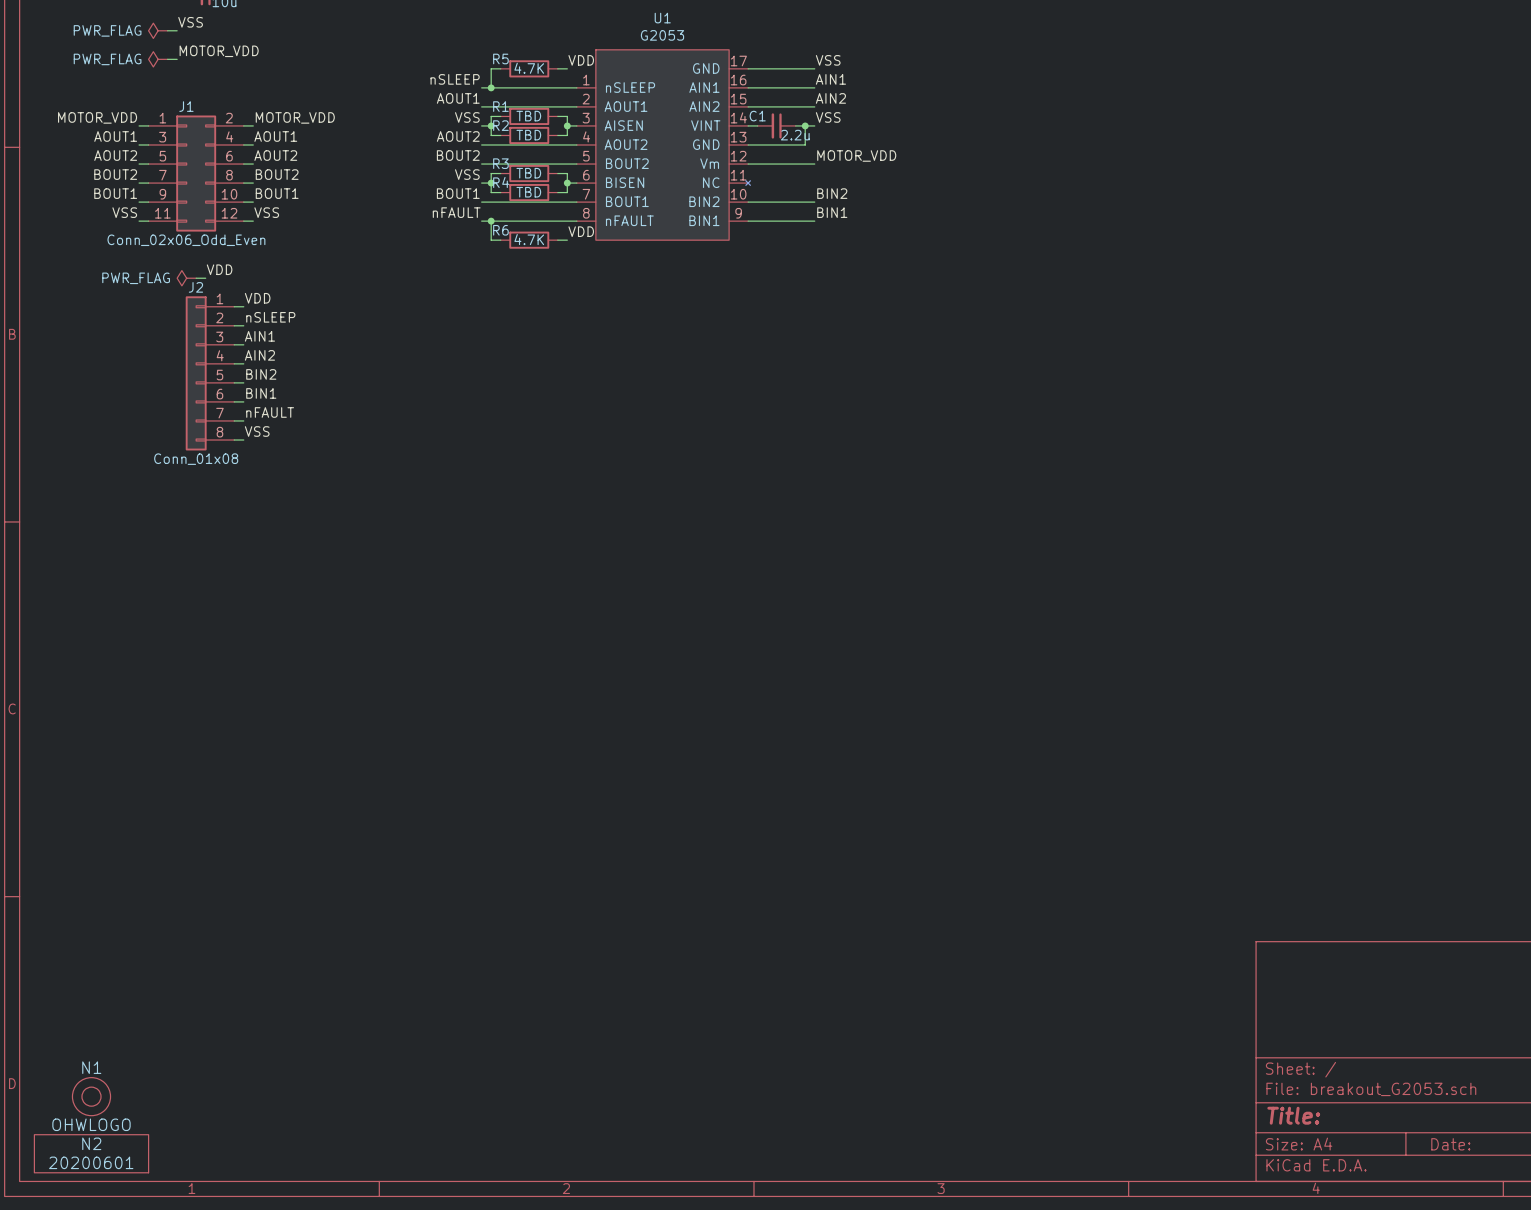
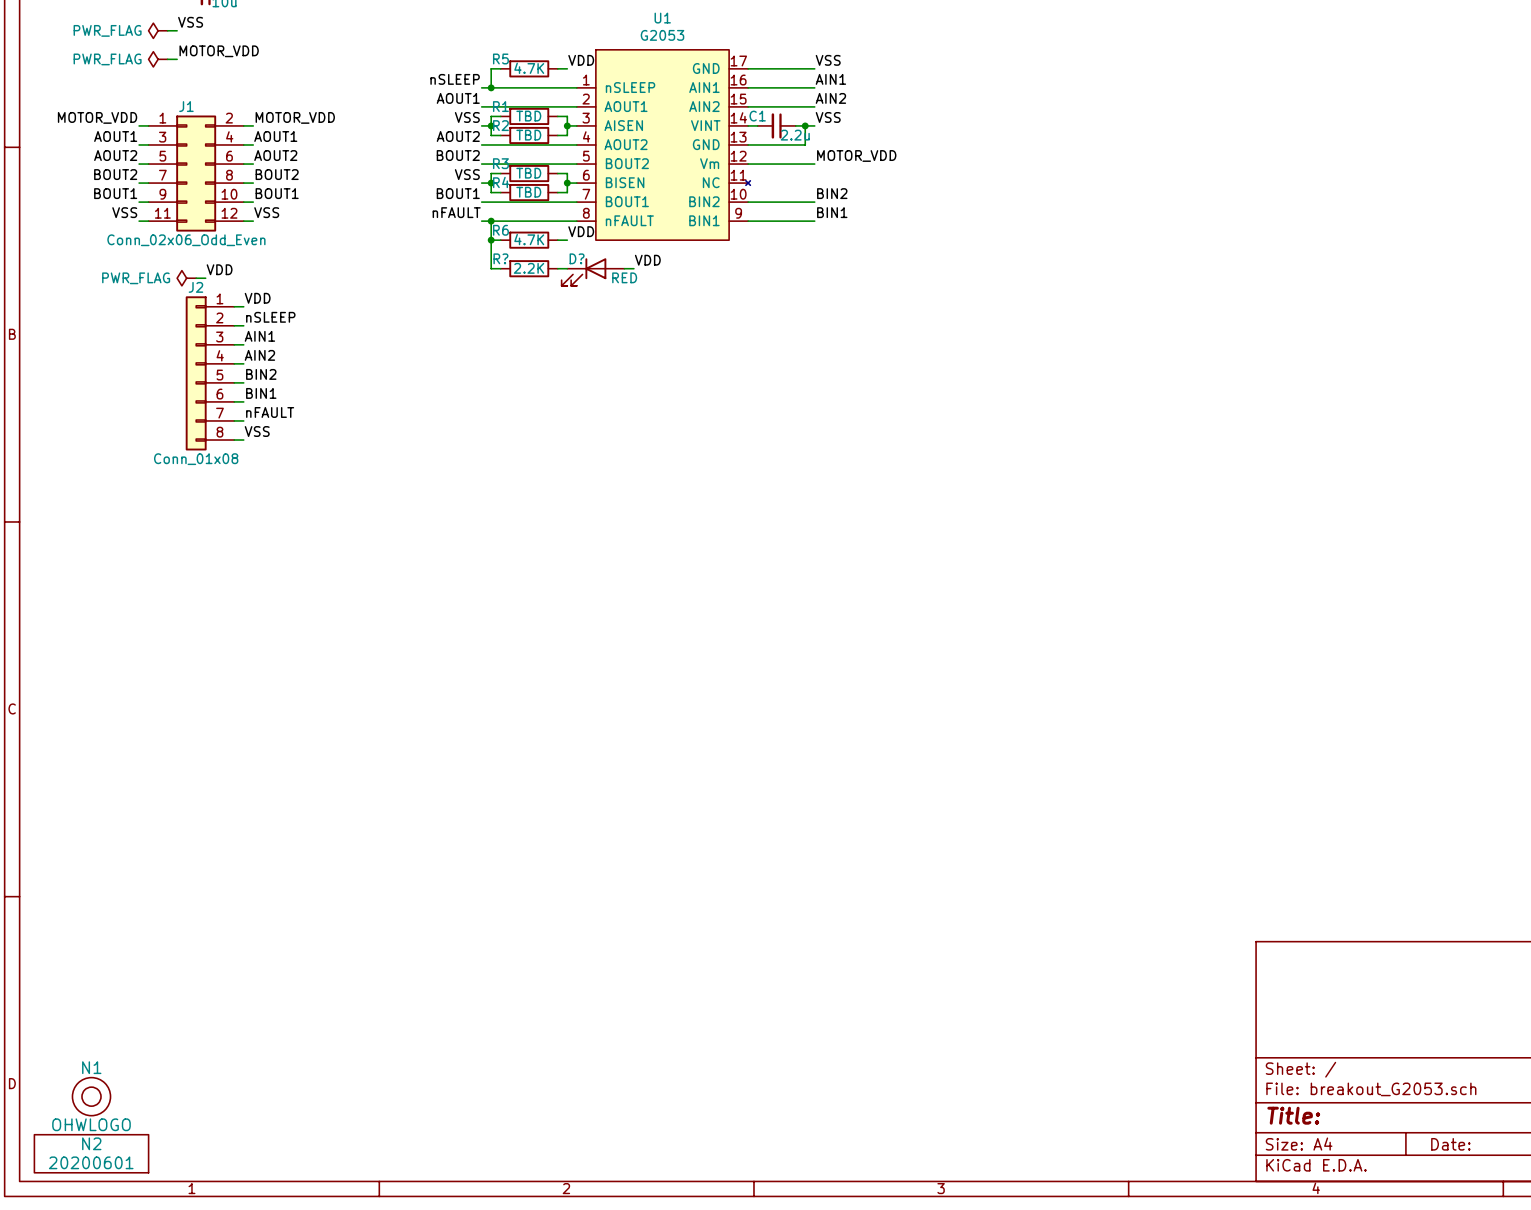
wire: none -> (491, 240) (491, 268) (500, 268)
junction: none -> (491, 240)
label: none -> VDD (647, 260)
R?: none -> 2.2K (529, 268)
wire: none -> (557, 268) (567, 268)
wire: none -> (624, 268) (633, 268)
D?: none -> RED (593, 272)

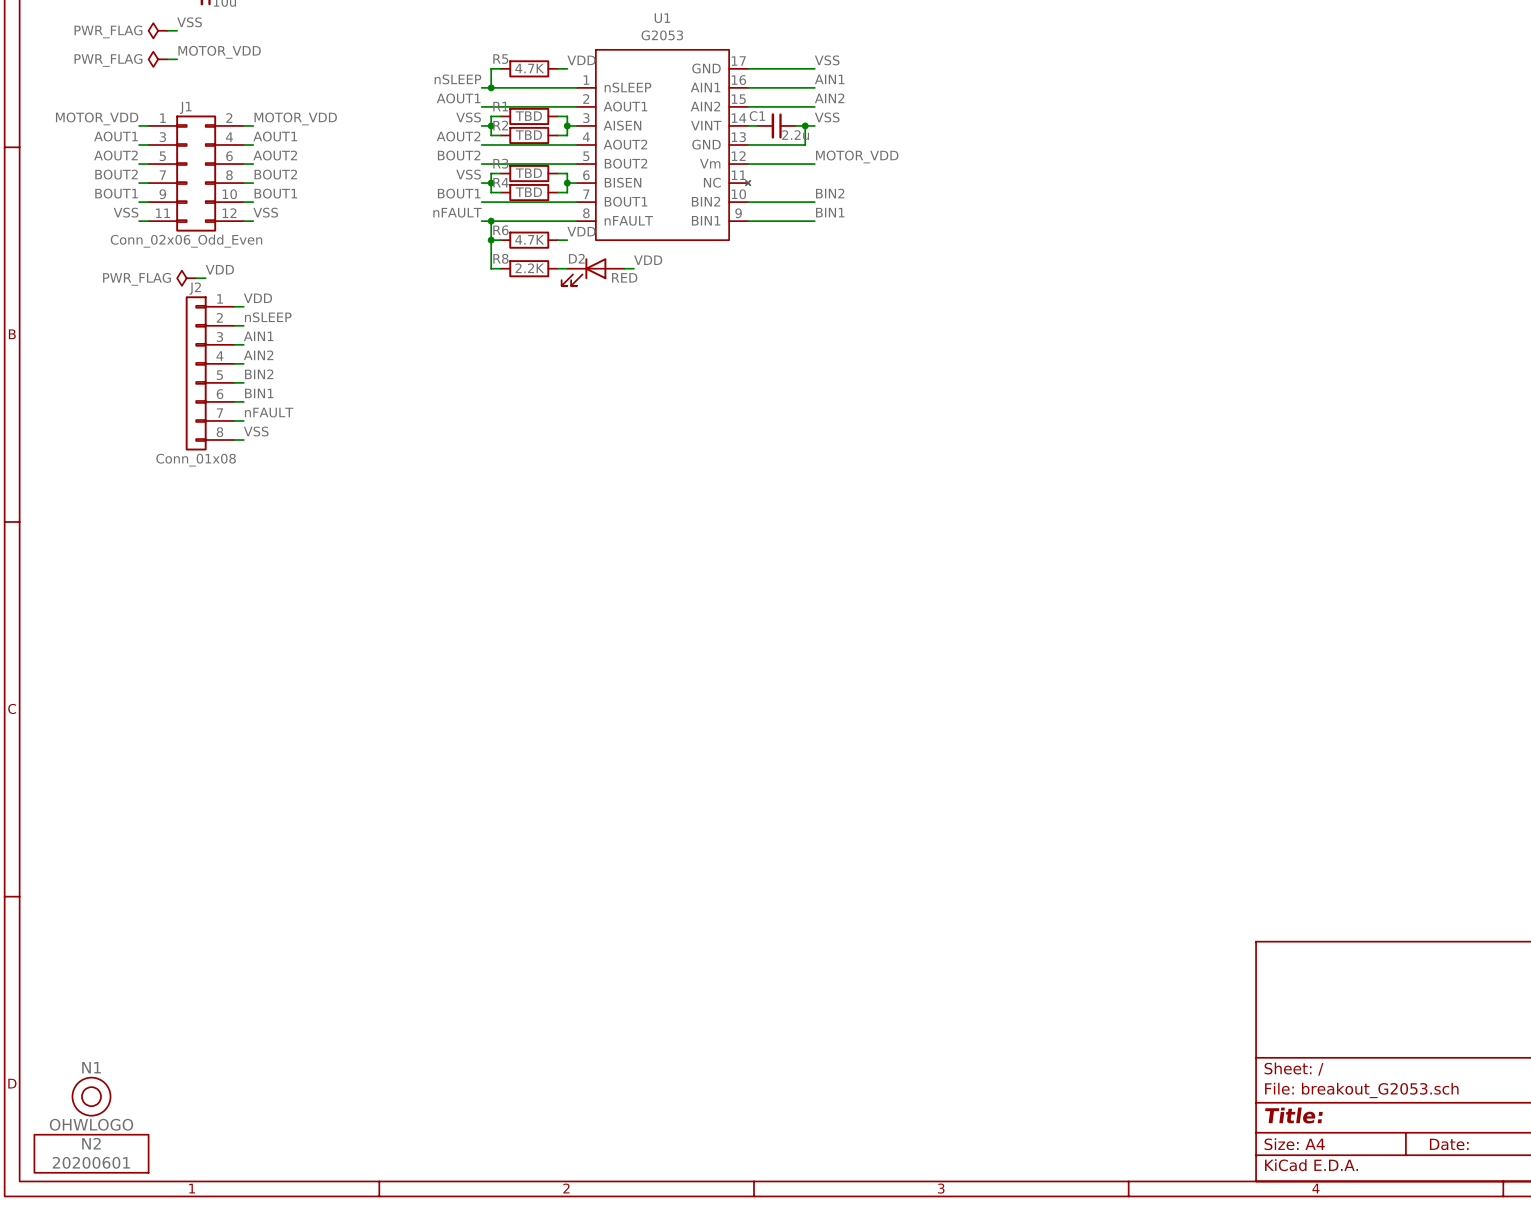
R? name: R? (500, 258) -> R8 (500, 258)
D? name: D? (577, 258) -> D2 (576, 258)

